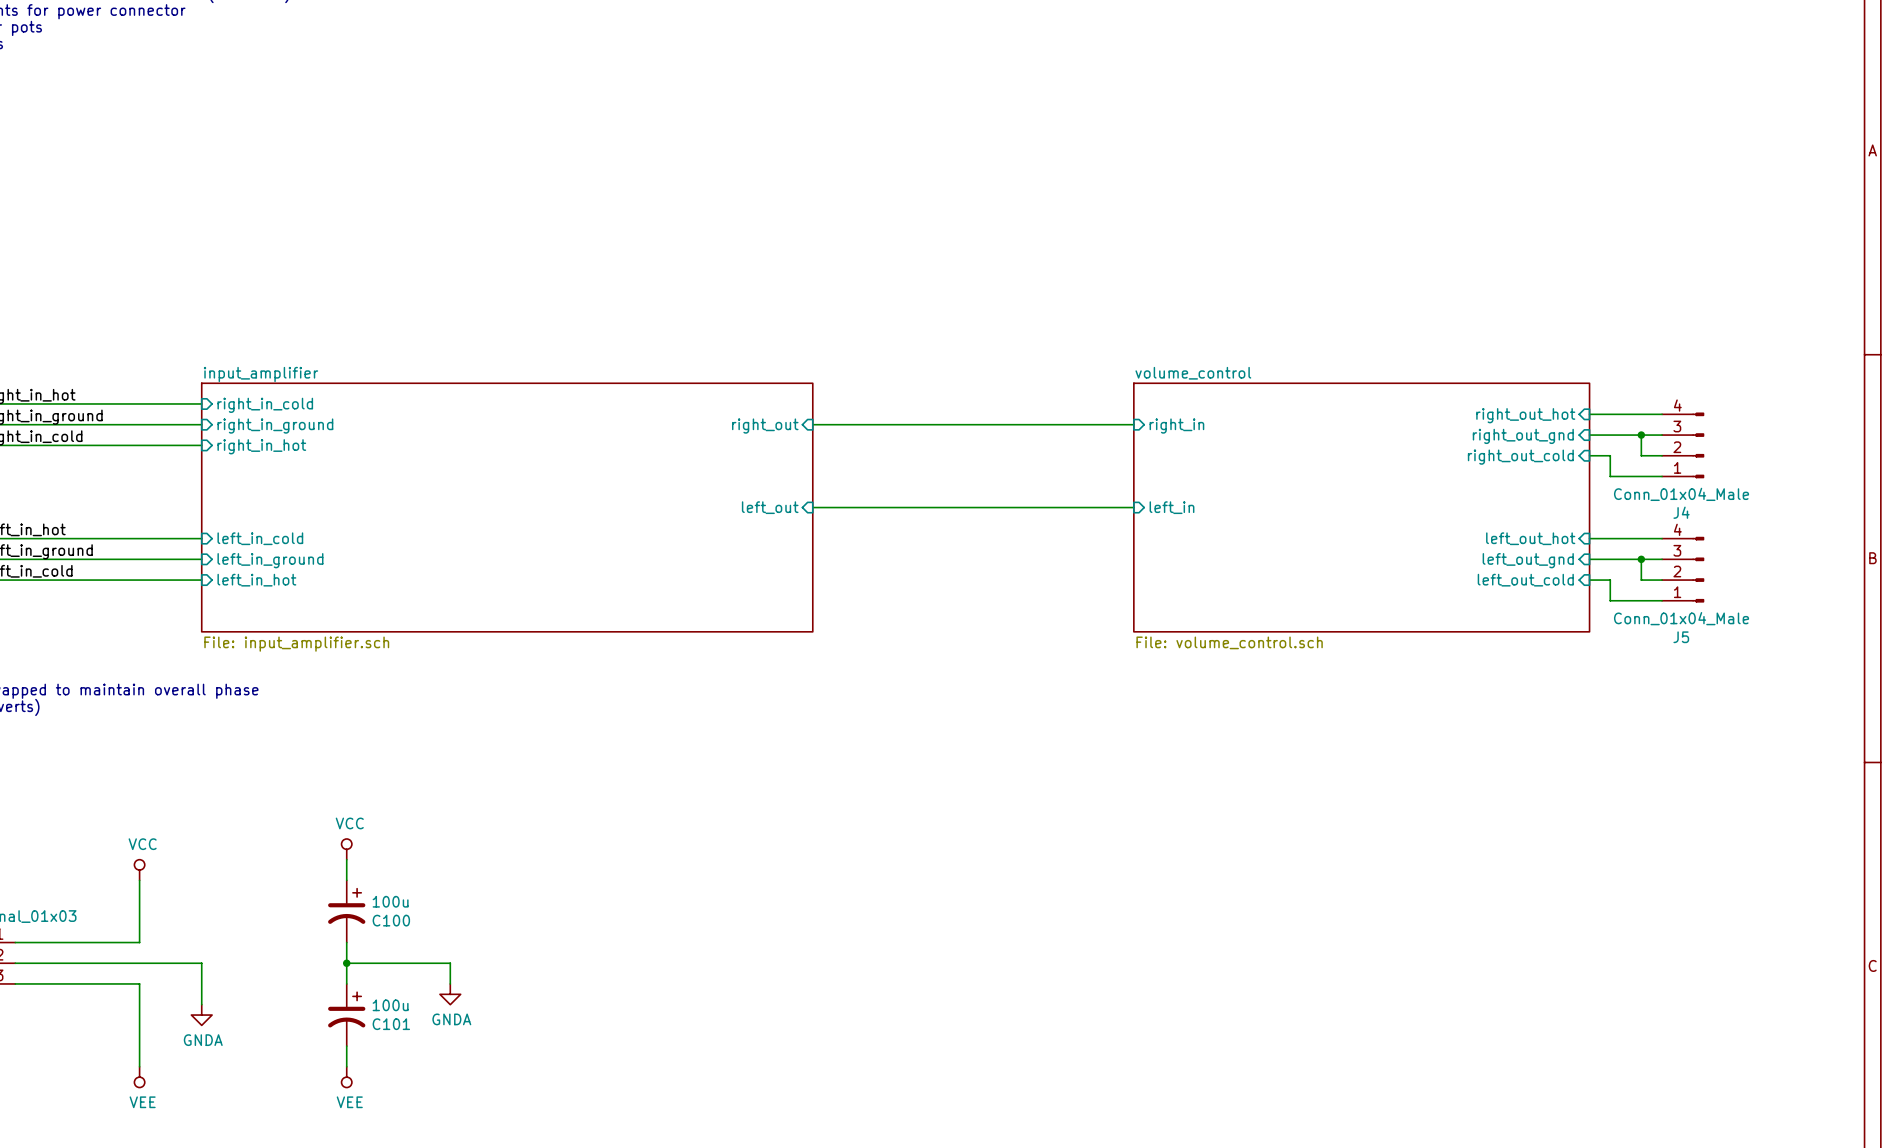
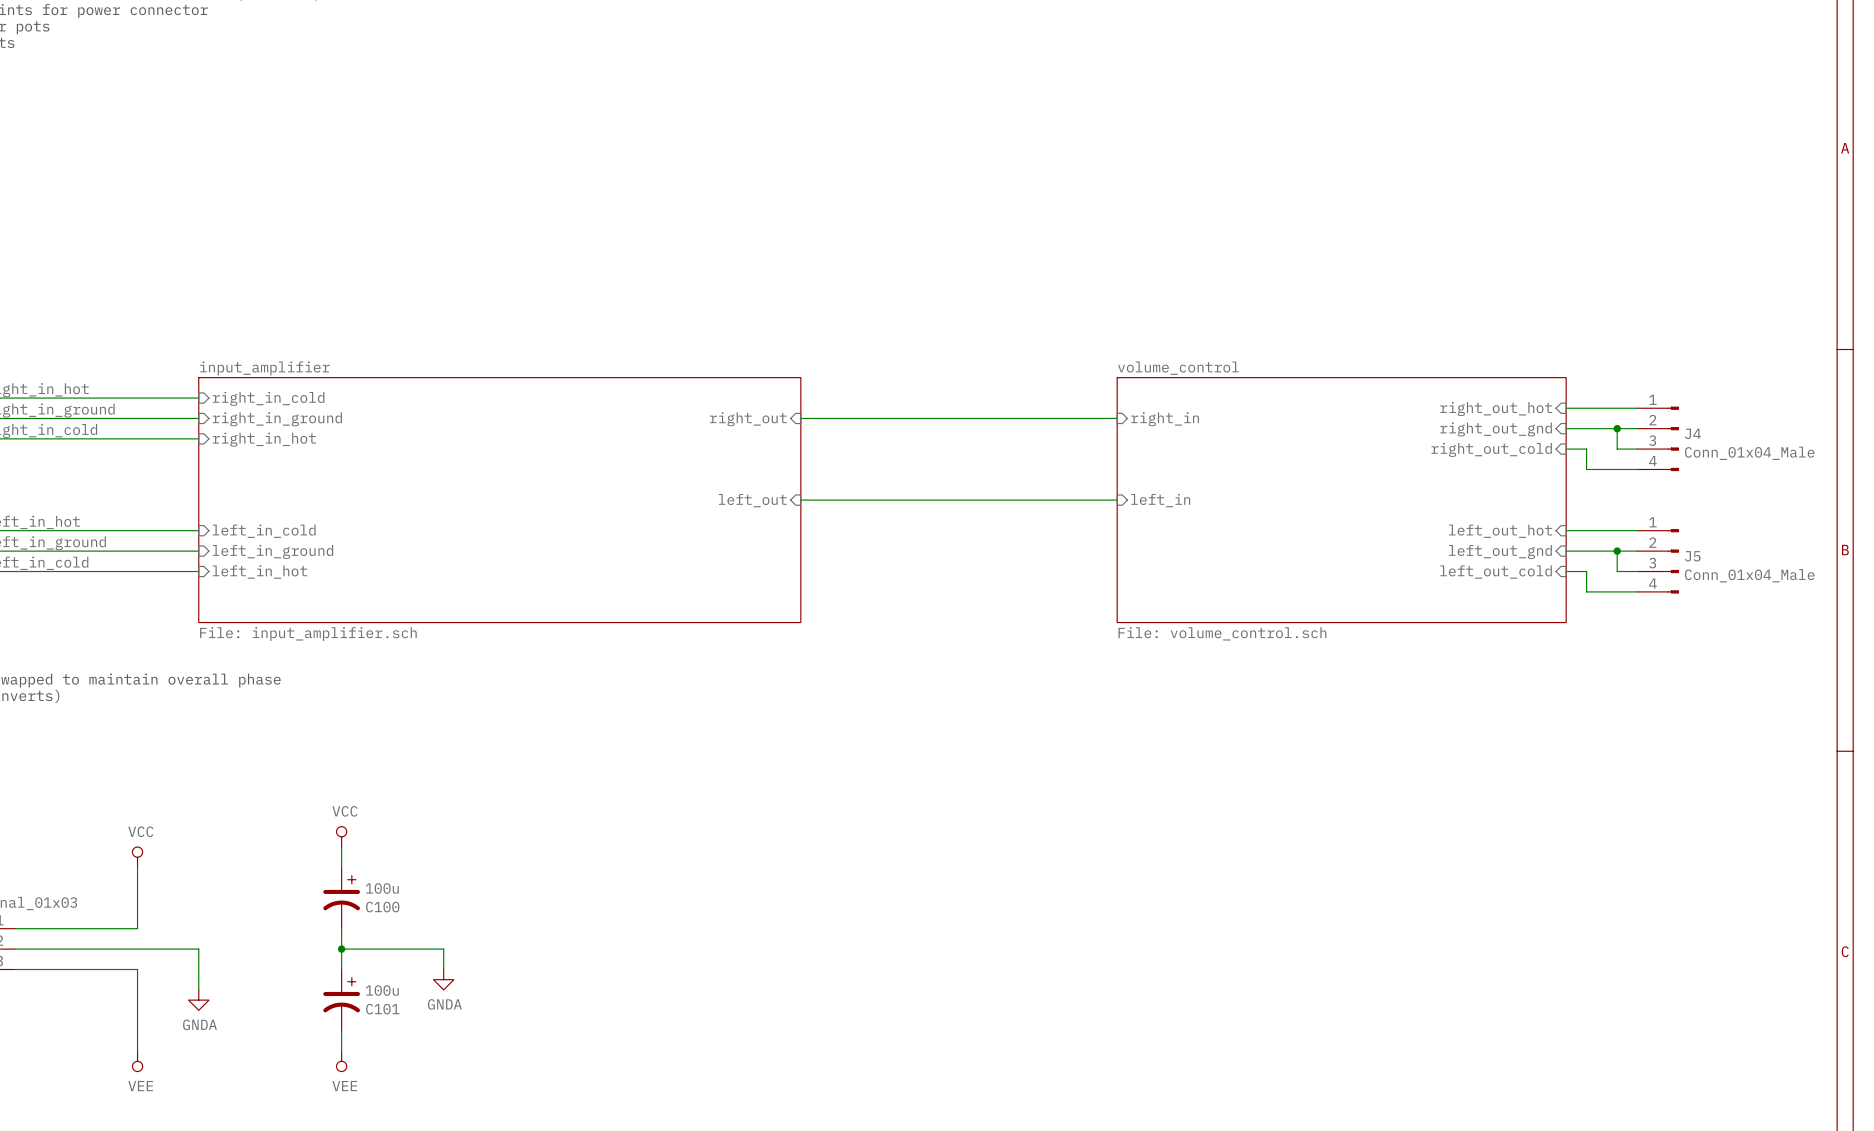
J4 flip: as is (1698, 445) -> up-down (1673, 438)
J4 value position: Conn_01x04_Male (1681, 494) -> Conn_01x04_Male (1749, 453)
J4 name position: J4 (1681, 512) -> J4 (1692, 433)
J5 flip: as is (1698, 569) -> up-down (1673, 561)
J5 value position: Conn_01x04_Male (1681, 618) -> Conn_01x04_Male (1749, 575)
J5 name position: J5 (1681, 637) -> J5 (1692, 556)

